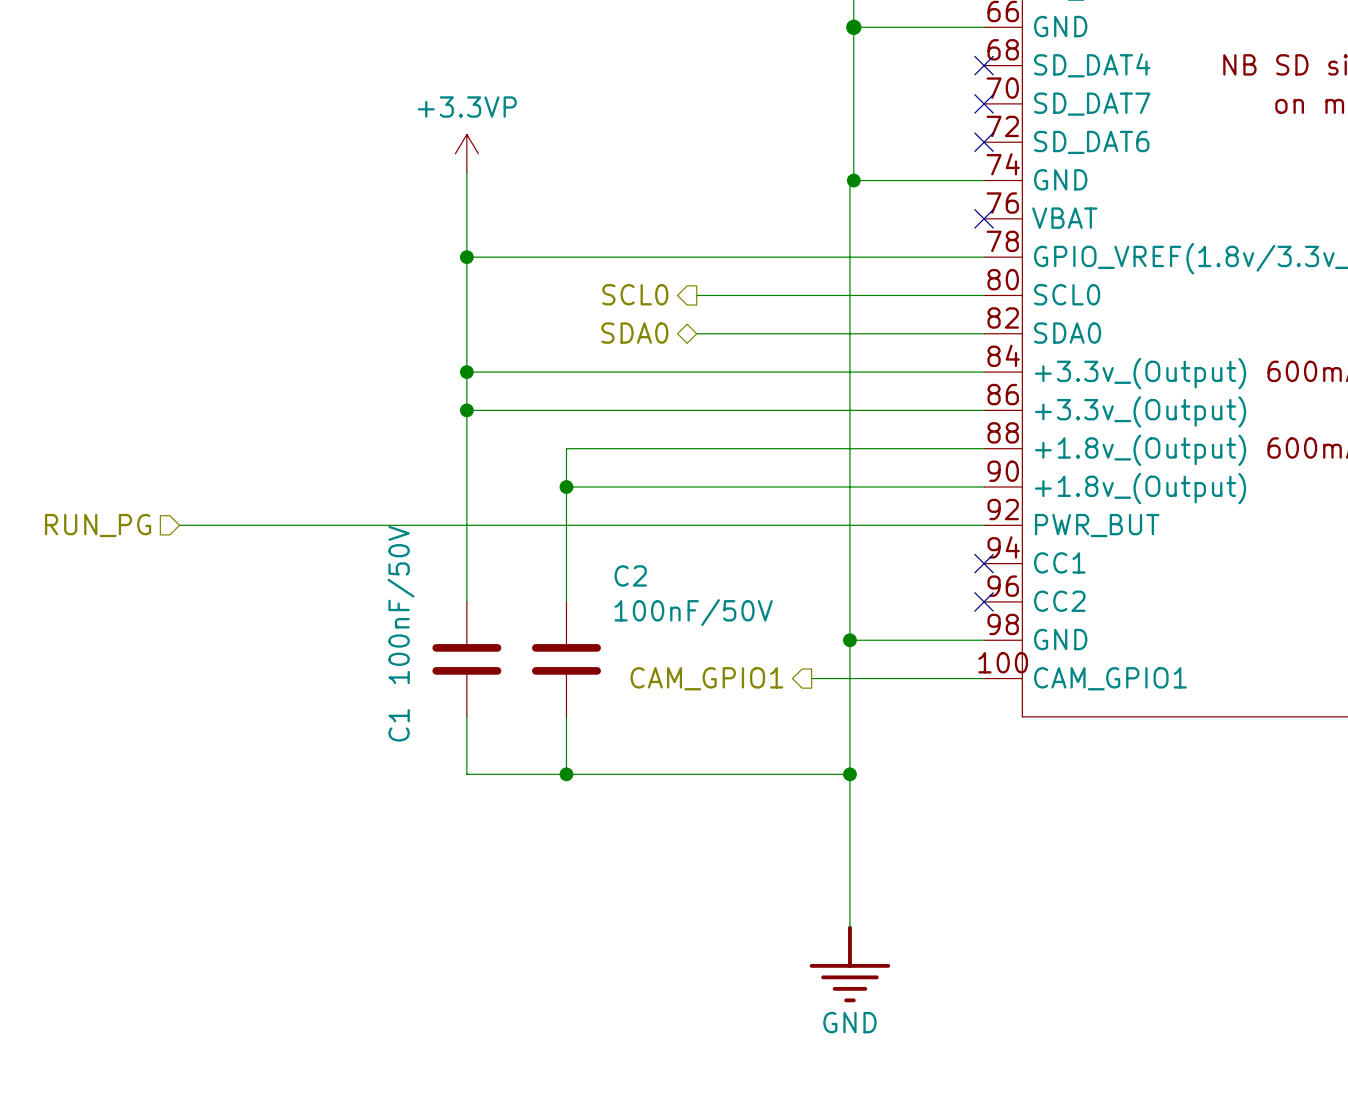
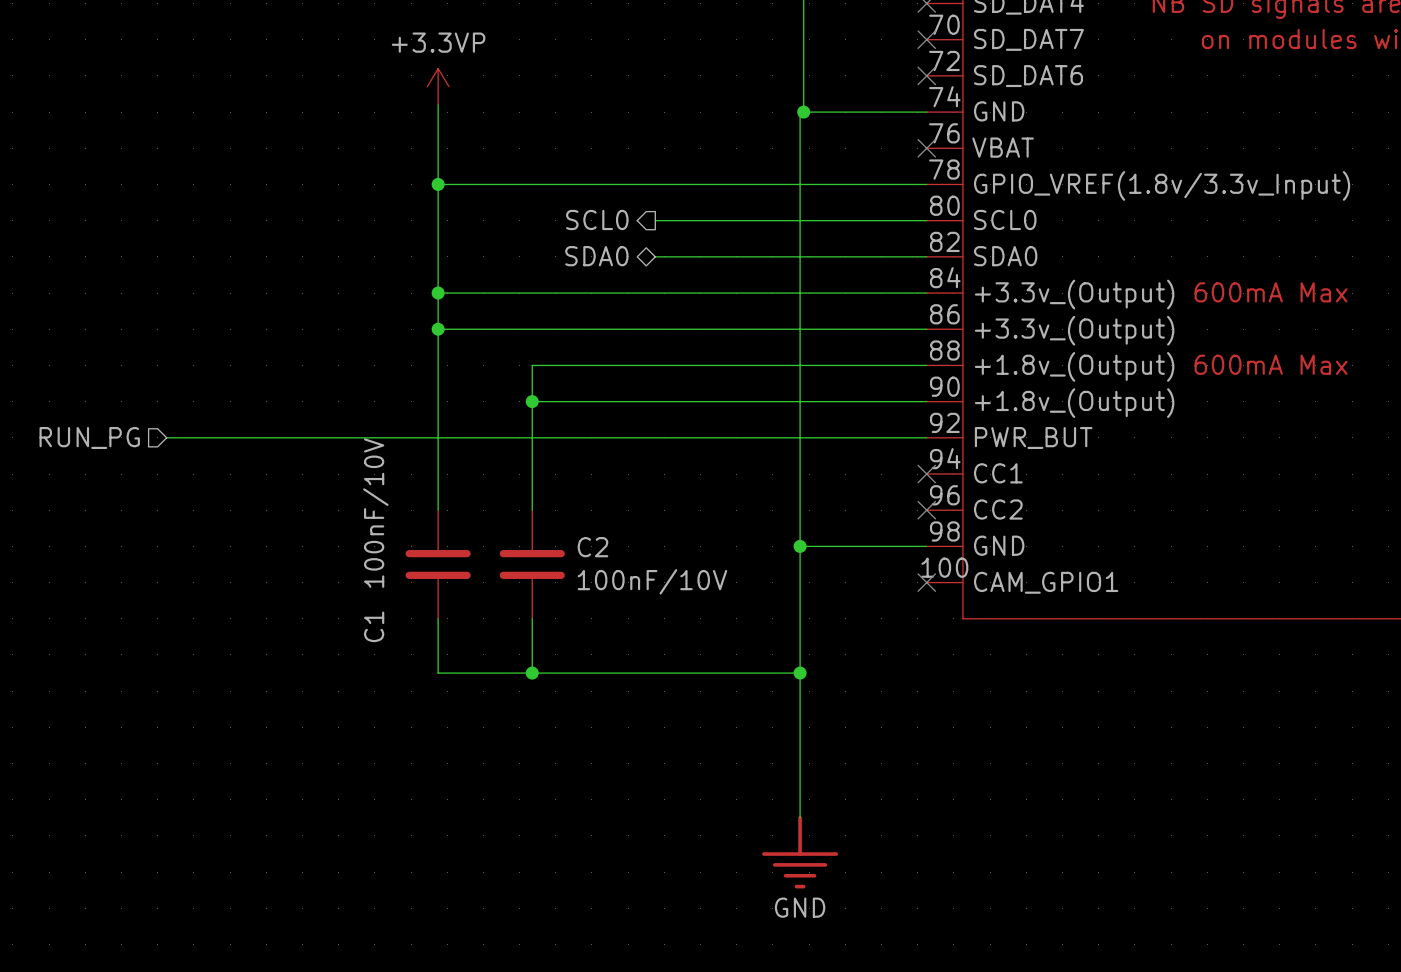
C2 name position: C2 (630, 575) -> C2 (592, 547)
C1 value: 100nF/50V (400, 604) -> 100nF/10V (375, 513)
C2 value: 100nF/50V (693, 612) -> 100nF/10V (652, 581)
hierarchical label: CAM_GPIO1 (706, 678) -> none
wire: (811, 678) (984, 678) -> none
no-connect mark: none -> (926, 582)

